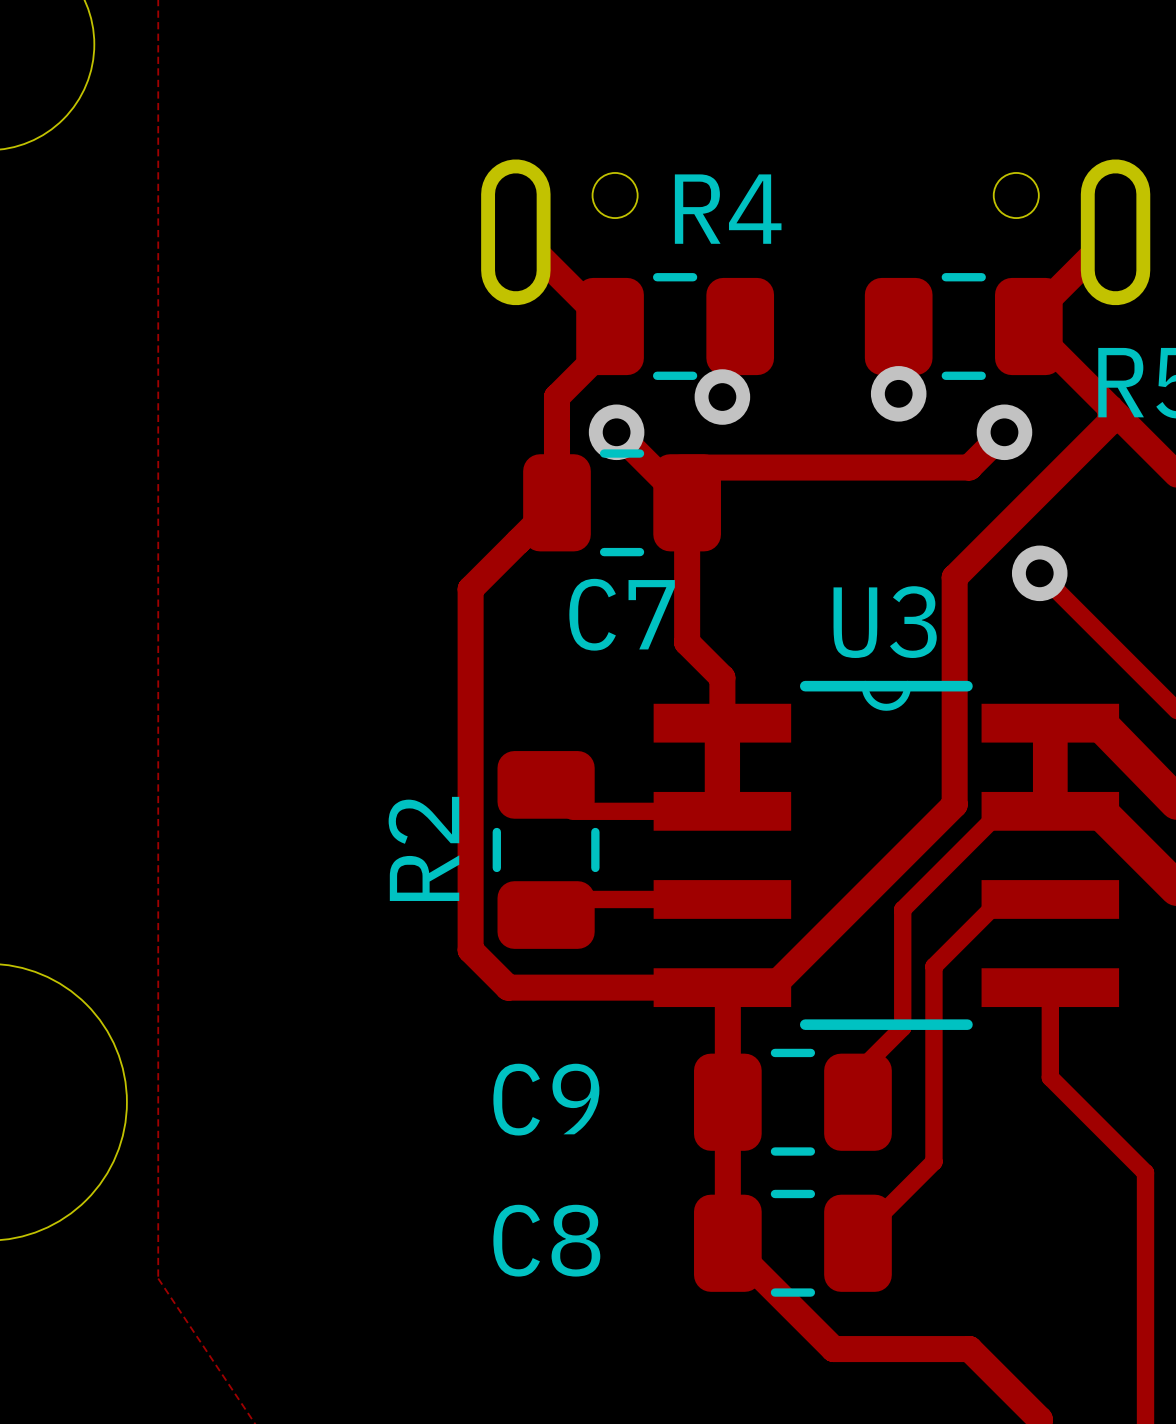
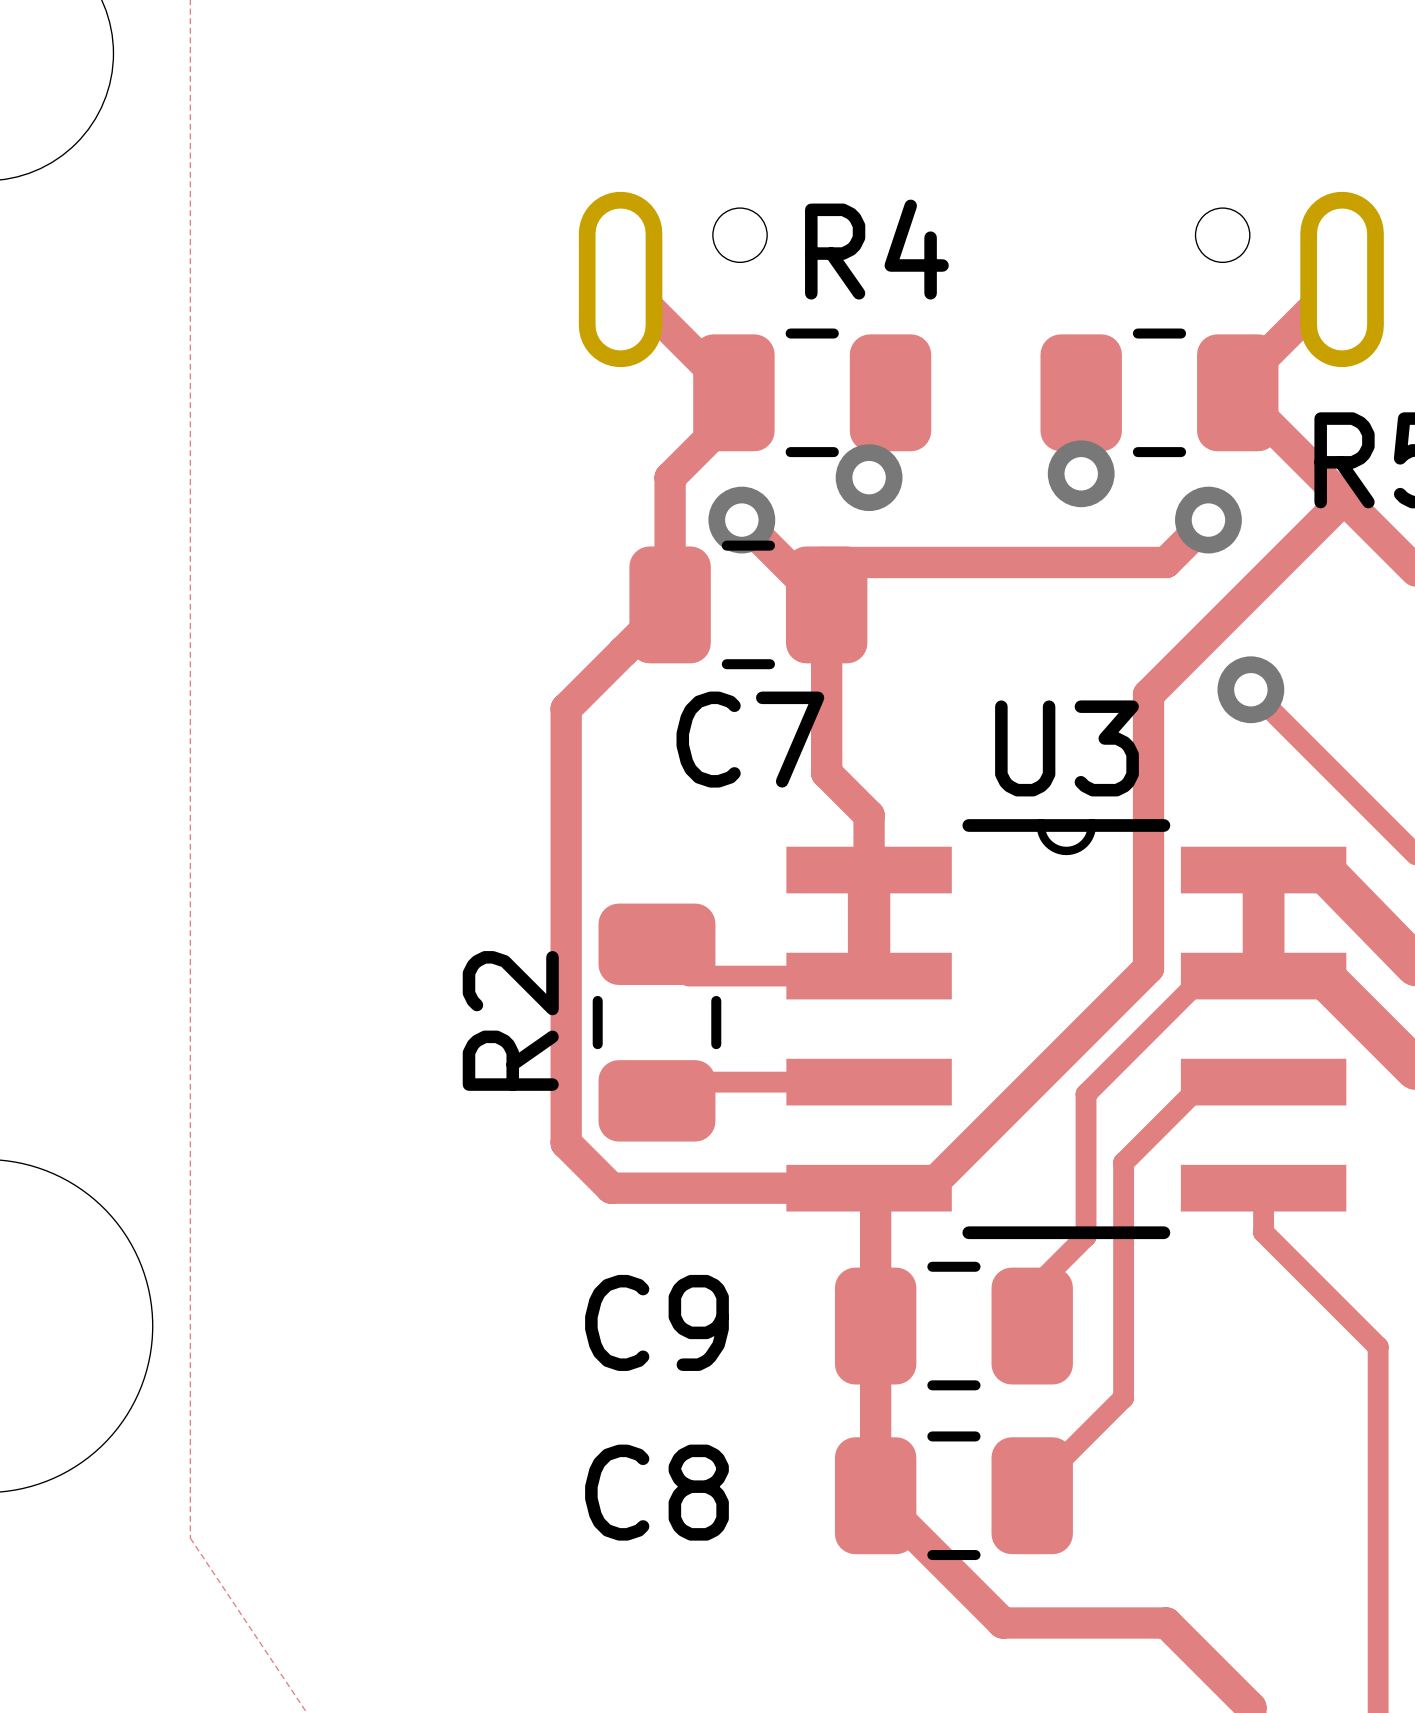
track: (1050, 1024) (1050, 1077) (1145, 1172) -> (1263, 1232) (1378, 1346) (1378, 1410)

